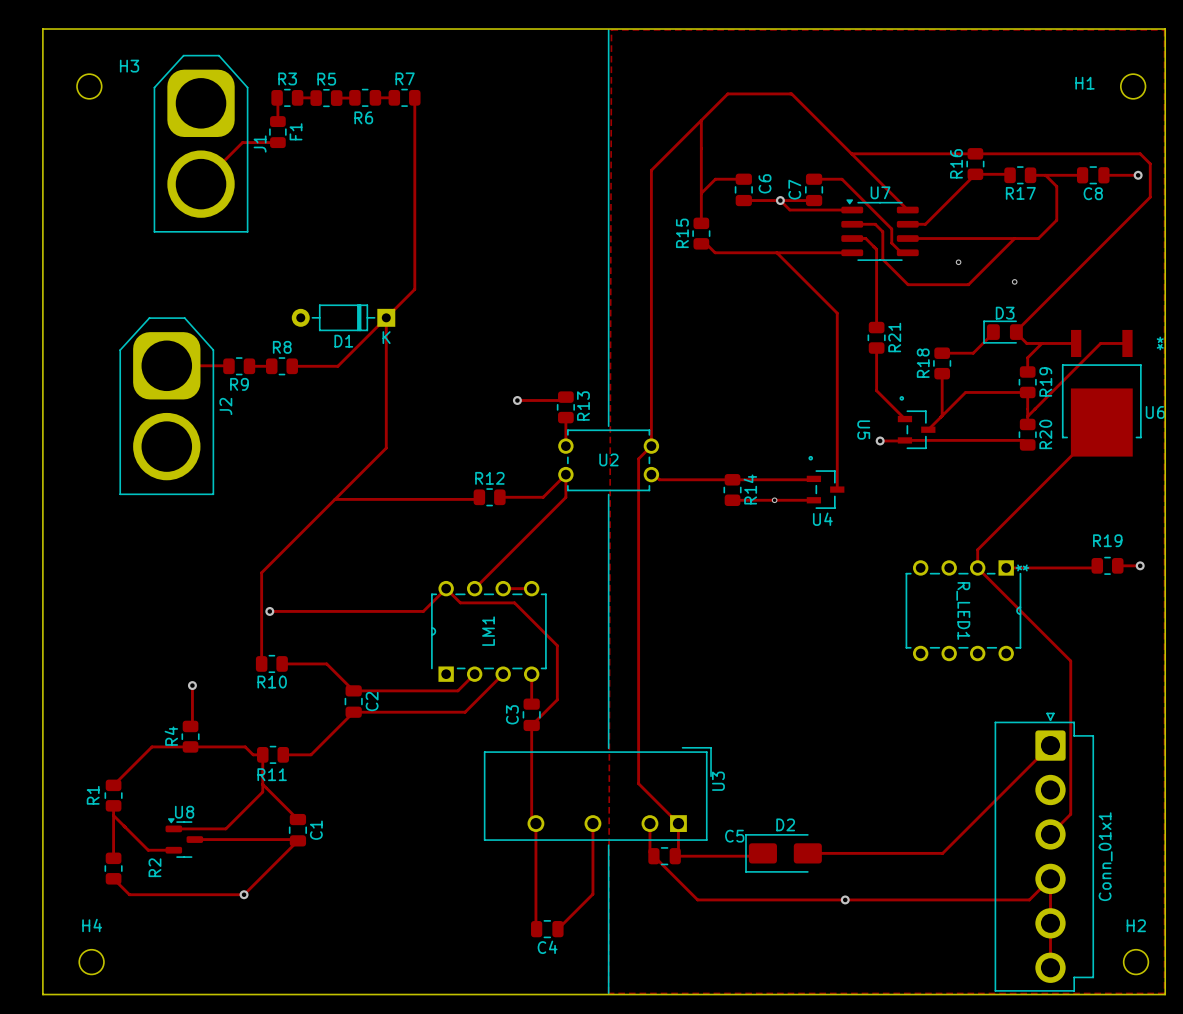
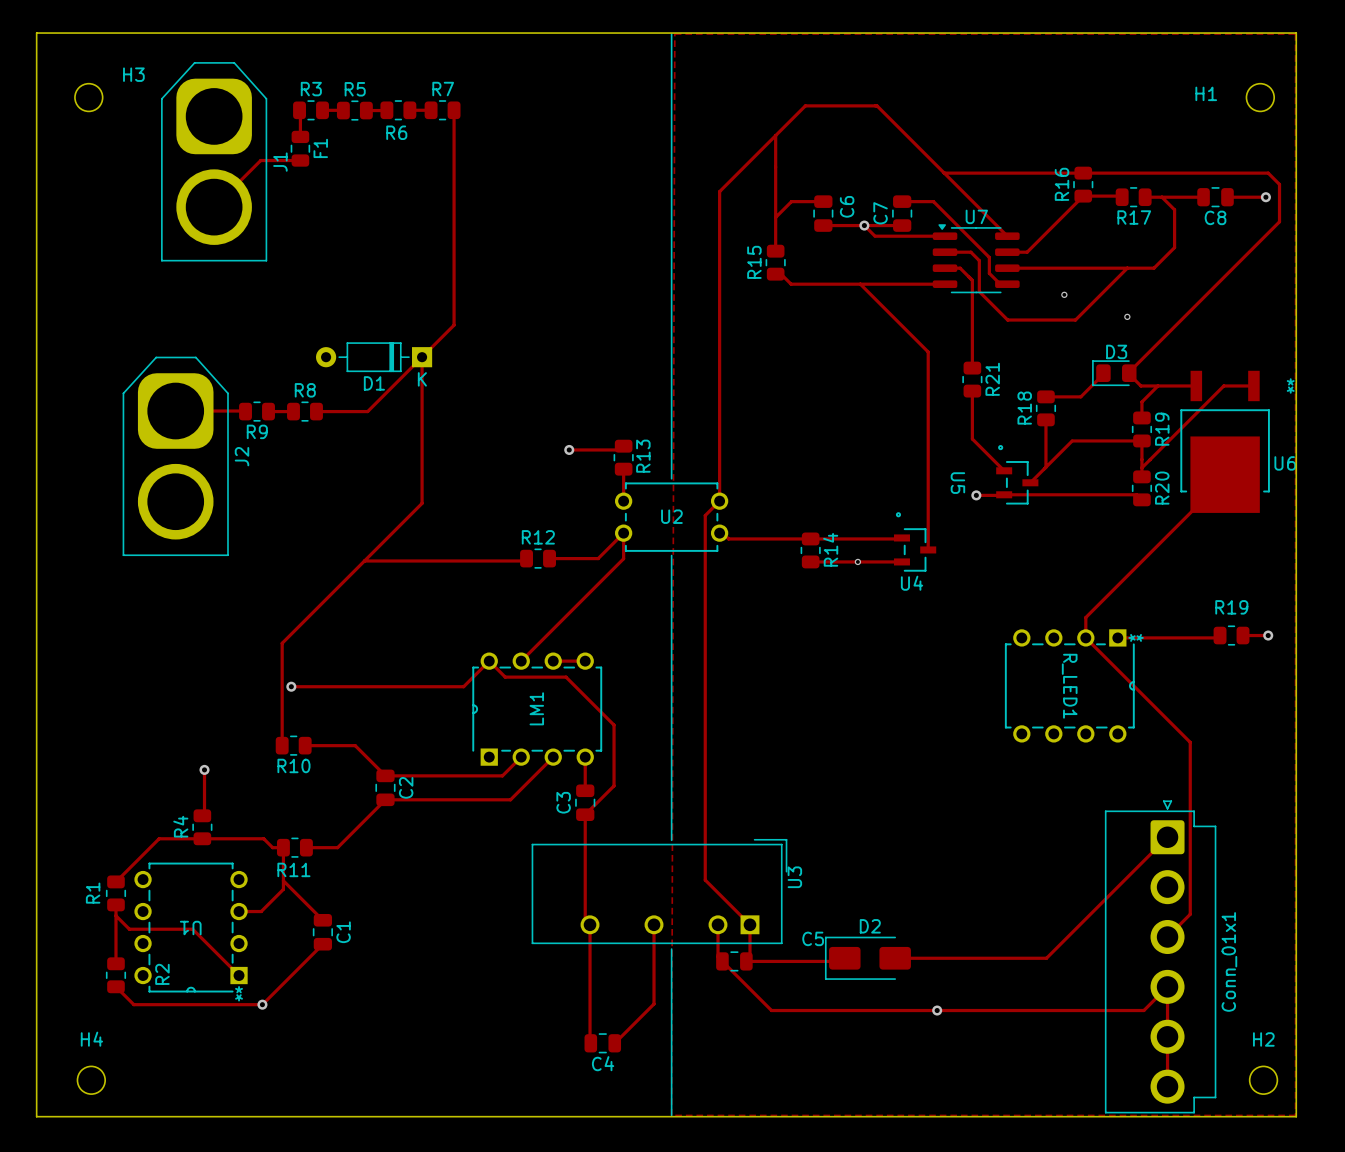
track: (243, 811) (225, 828) (173, 828) -> (261, 911) (239, 911)
U1: none -> (191, 927)
track: (125, 827) (148, 850) (173, 850) -> (129, 929) (192, 929) (239, 975)
U8: (184, 837) -> none
track: (194, 839) (297, 840) -> none

